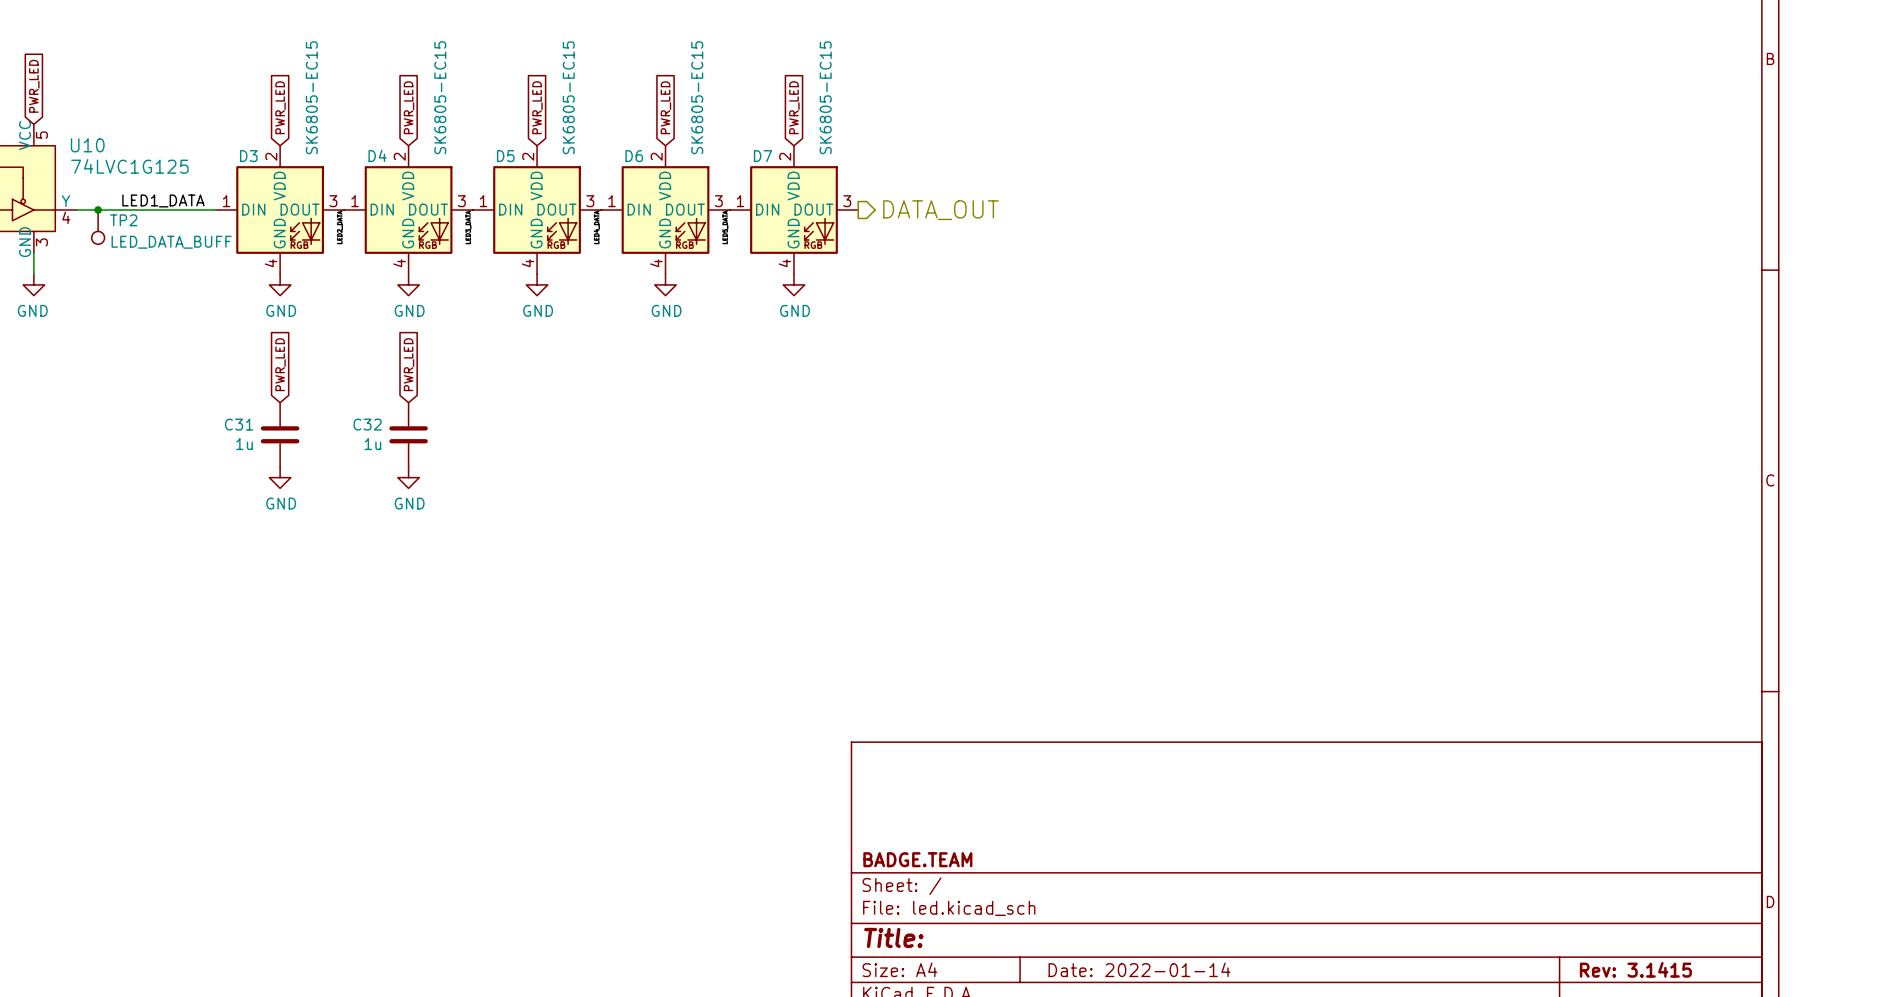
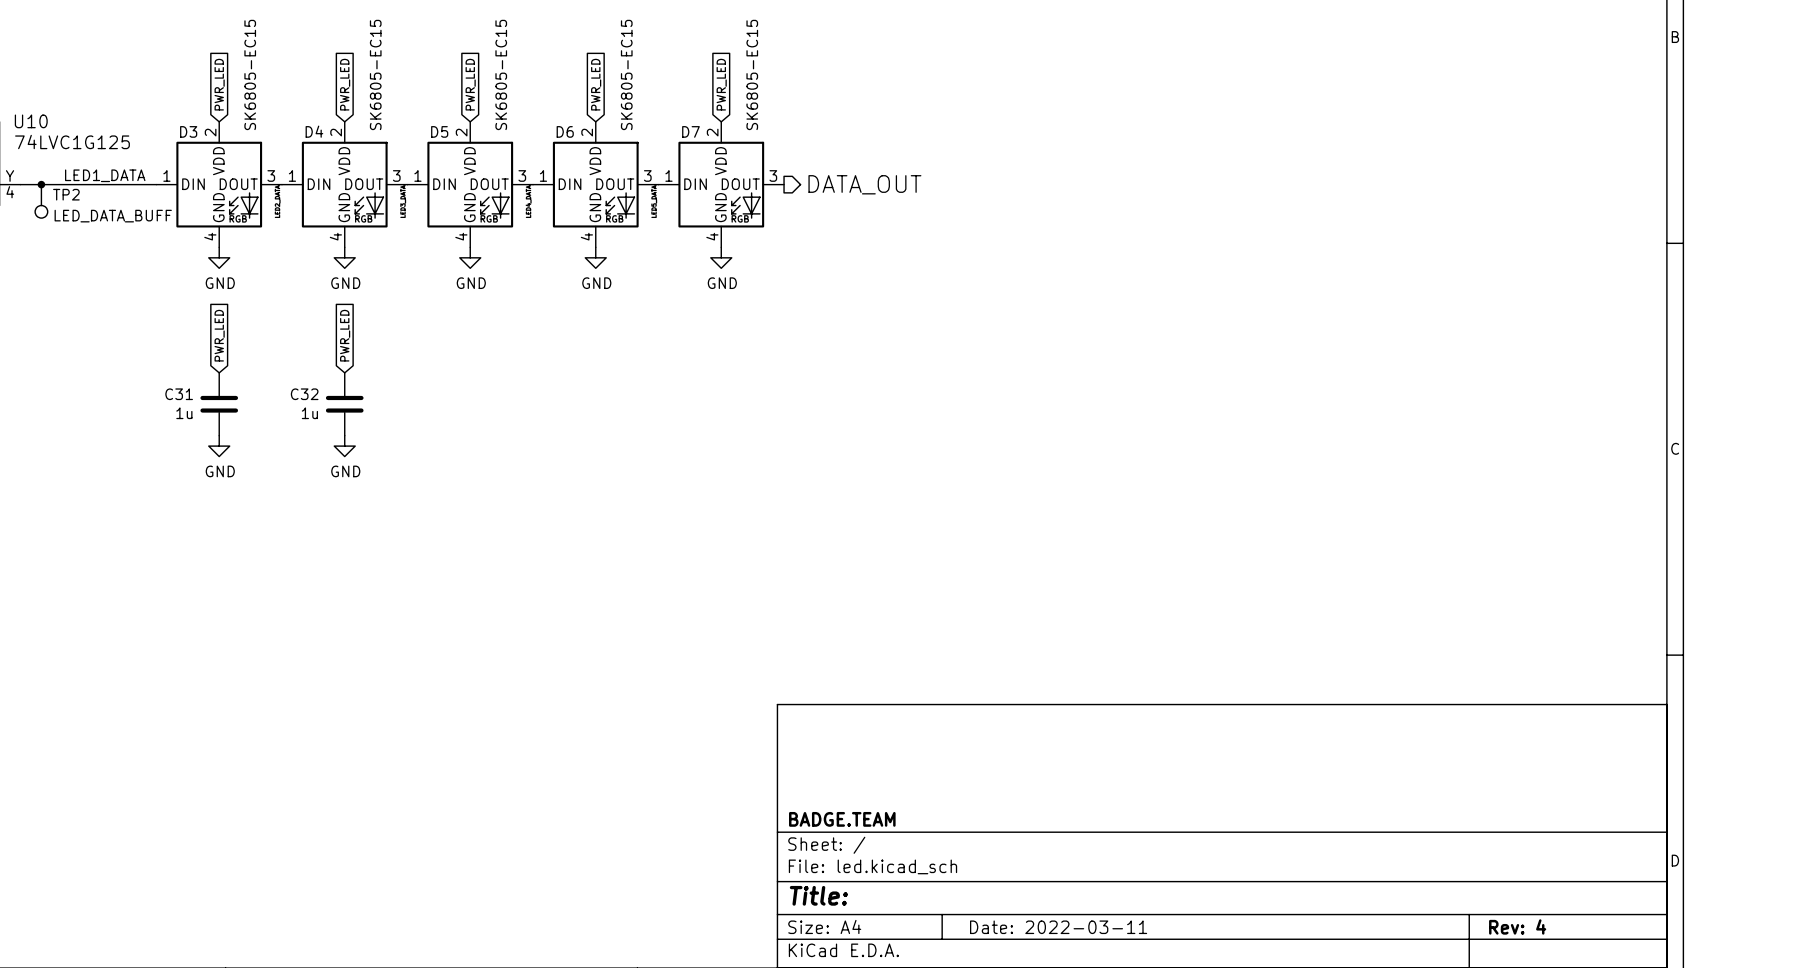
title block: Date: 2022-01-14 (1139, 969) -> Date: 2022-03-11 (1058, 927)
title block: Rev: 3.1415 (1635, 969) -> Rev: 4 (1517, 926)

